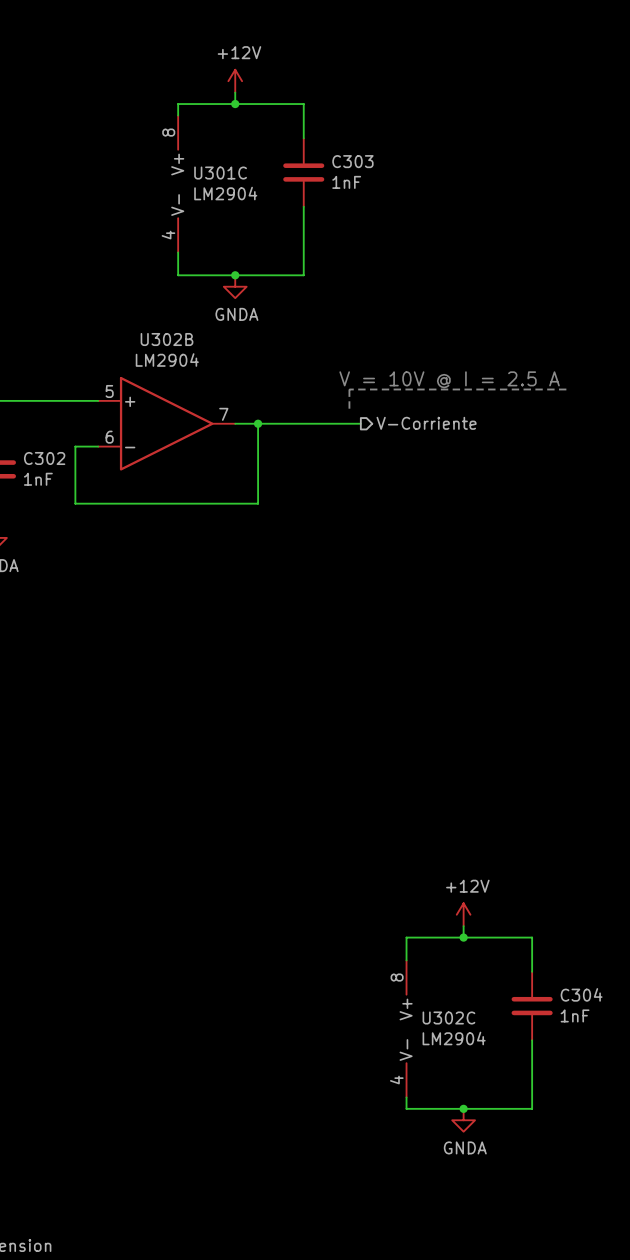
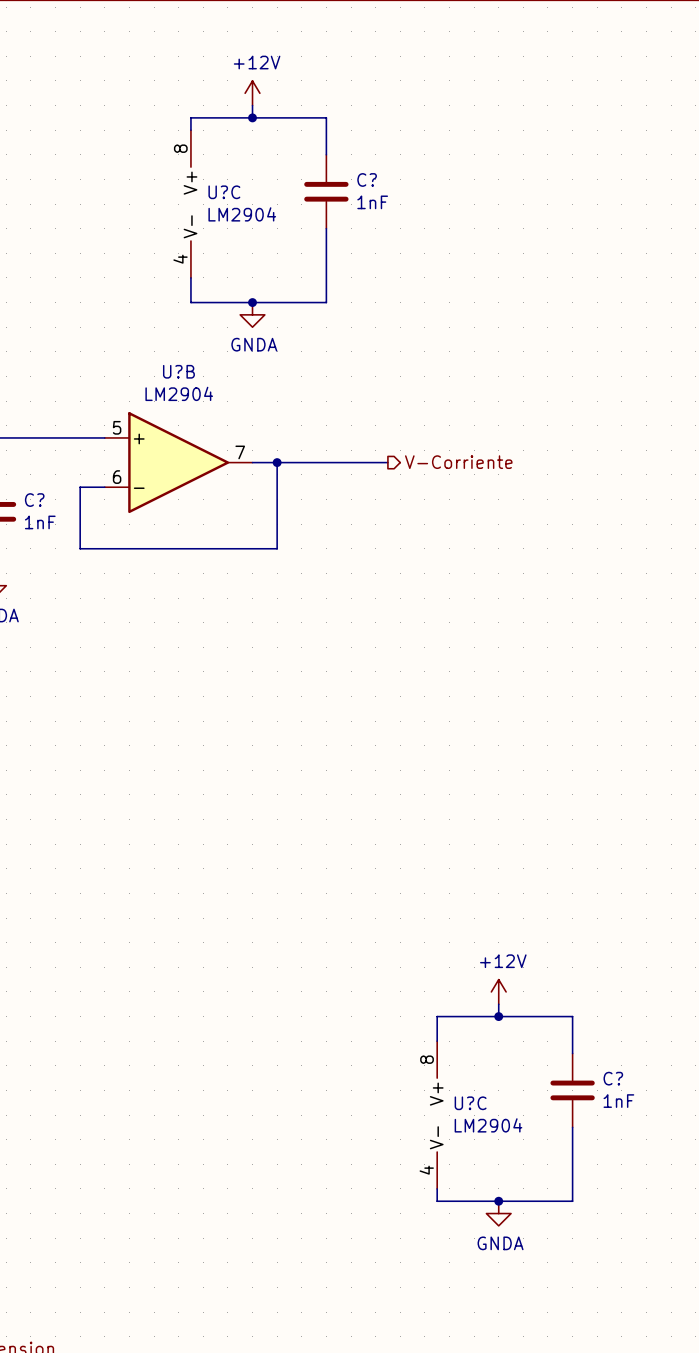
C303 name: C303 (352, 161) -> C? (367, 179)
U301C name: U301C (220, 173) -> U?C (224, 192)
U302B name: U302B (167, 339) -> U?B (178, 371)
text: V = 10V @ I = 2.5 A (449, 379) -> none
line: (566, 389) (349, 389) (349, 412) -> none
C302 name: C302 (44, 458) -> C? (34, 500)
C304 name: C304 (581, 994) -> C? (613, 1078)
U302C name: U302C (448, 1017) -> U?C (470, 1103)

